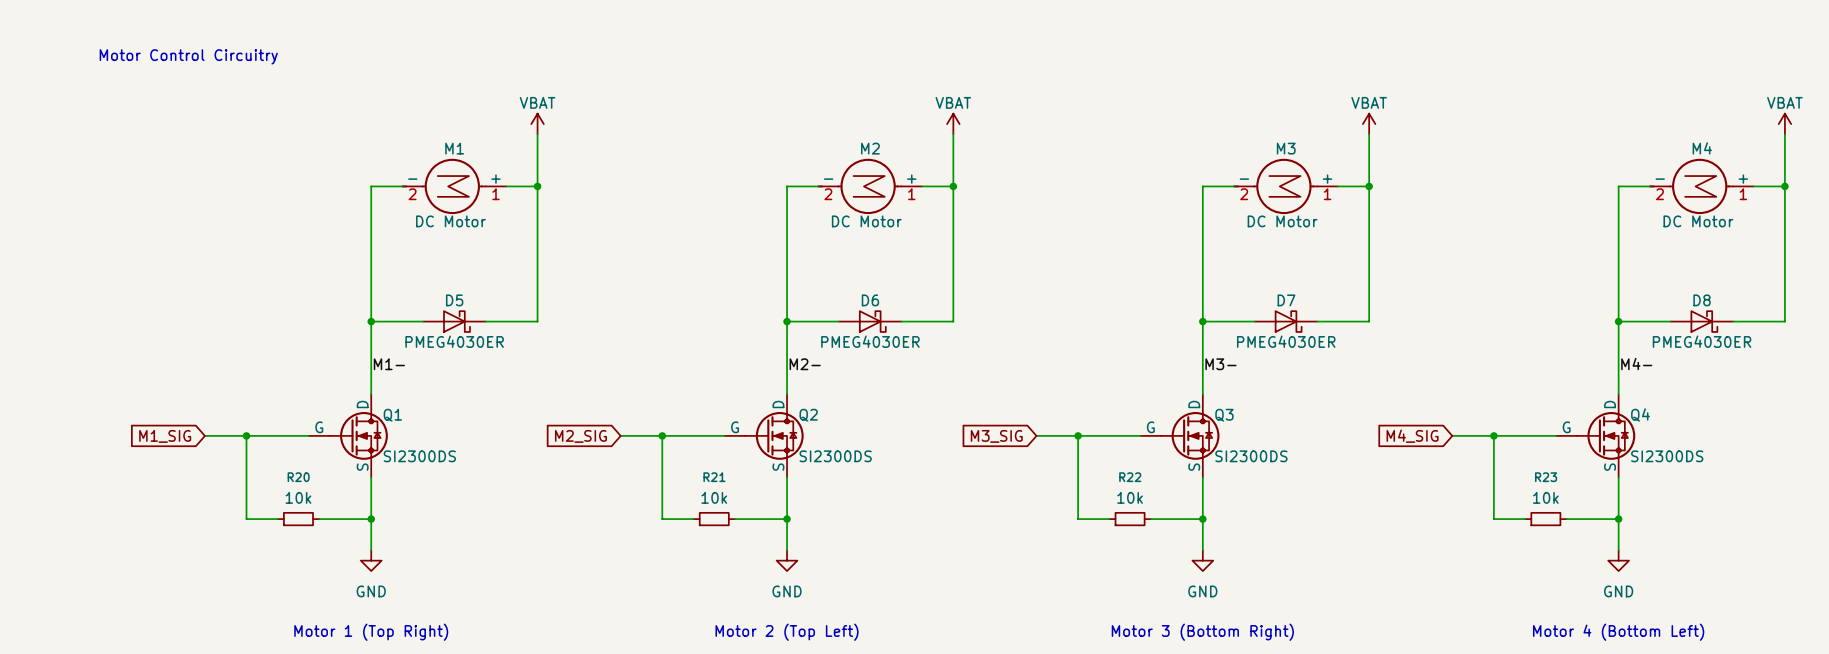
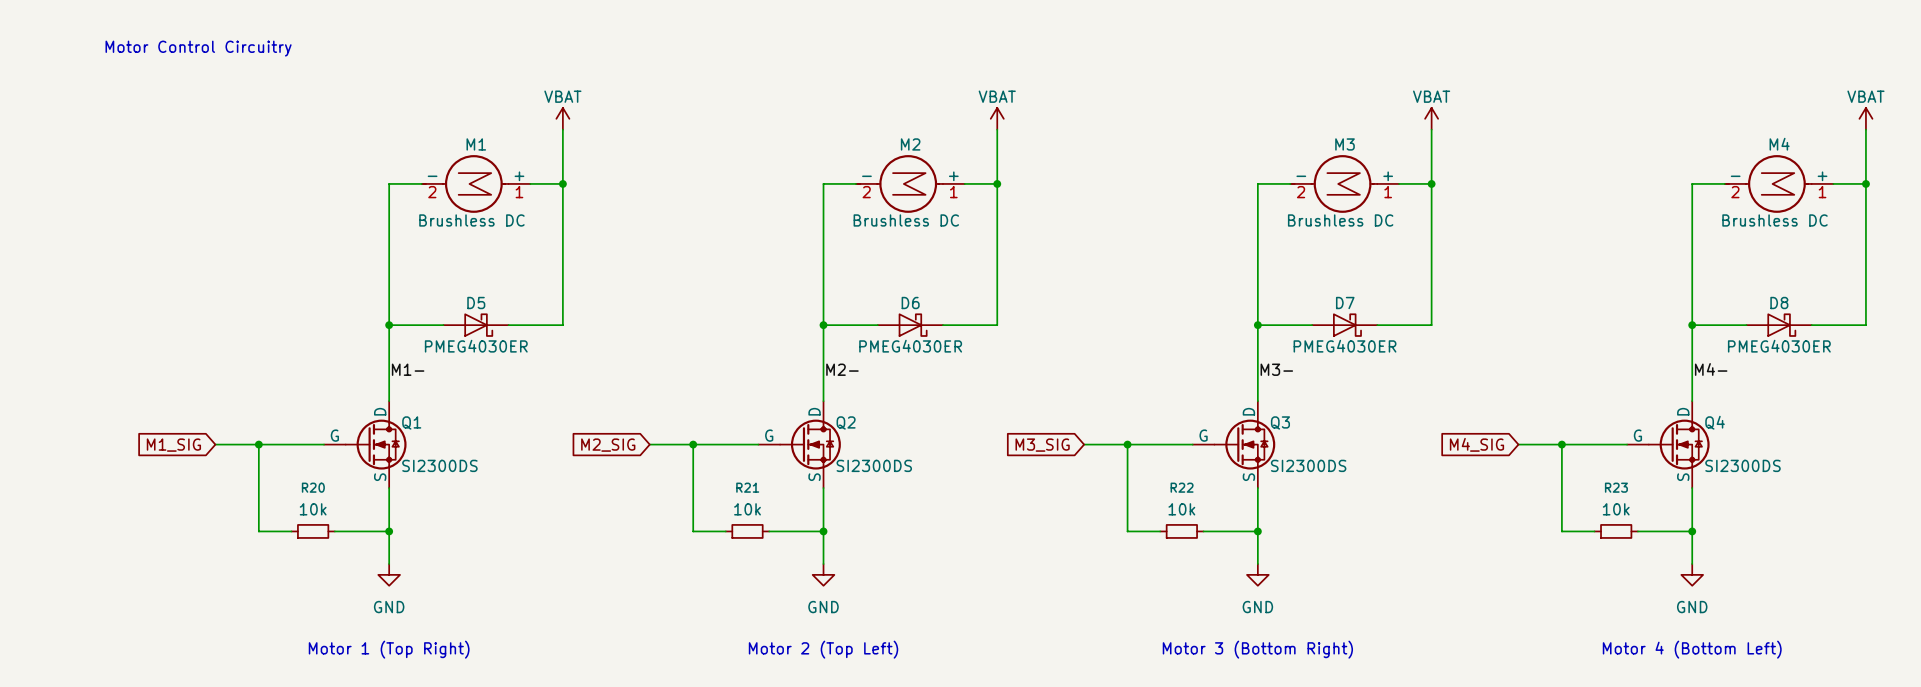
M1 value: DC Motor (450, 221) -> Brushless DC (471, 220)
M2 value: DC Motor (866, 221) -> Brushless DC (906, 220)
M3 value: DC Motor (1282, 221) -> Brushless DC (1340, 220)
M4 value: DC Motor (1698, 221) -> Brushless DC (1775, 220)

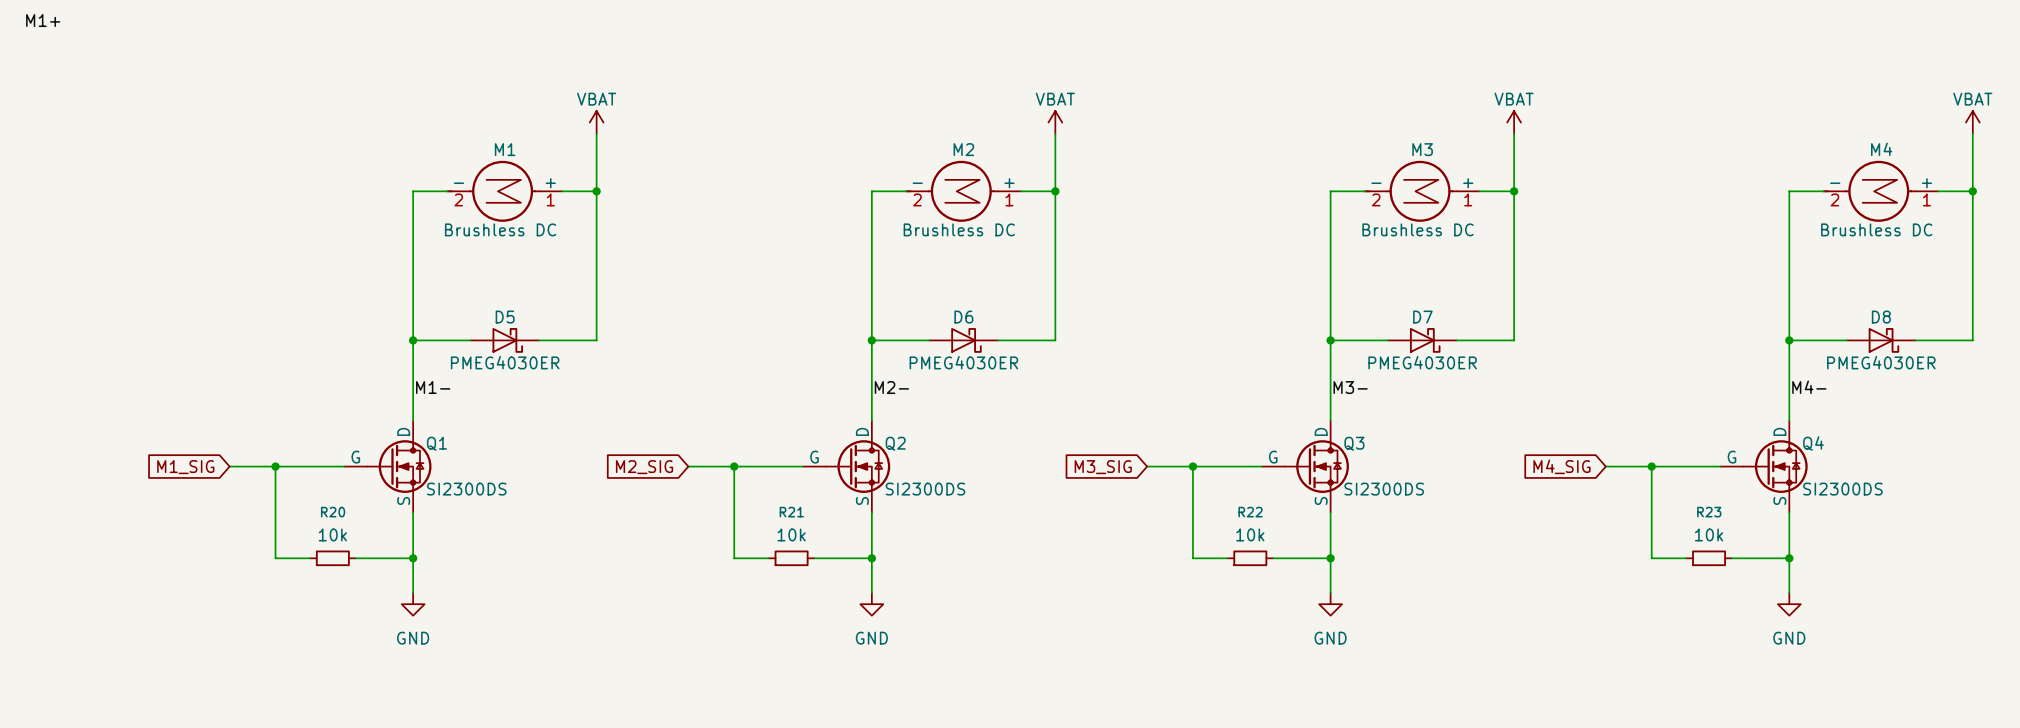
label: none -> M1+ (43, 20)
text: Motor Control Circuitry (198, 48) -> none
text: Motor 1 (Top Right) (389, 649) -> none
text: Motor 2 (Top Left) (823, 649) -> none
text: Motor 3 (Bottom Right) (1257, 649) -> none
text: Motor 4 (Bottom Left) (1692, 649) -> none

